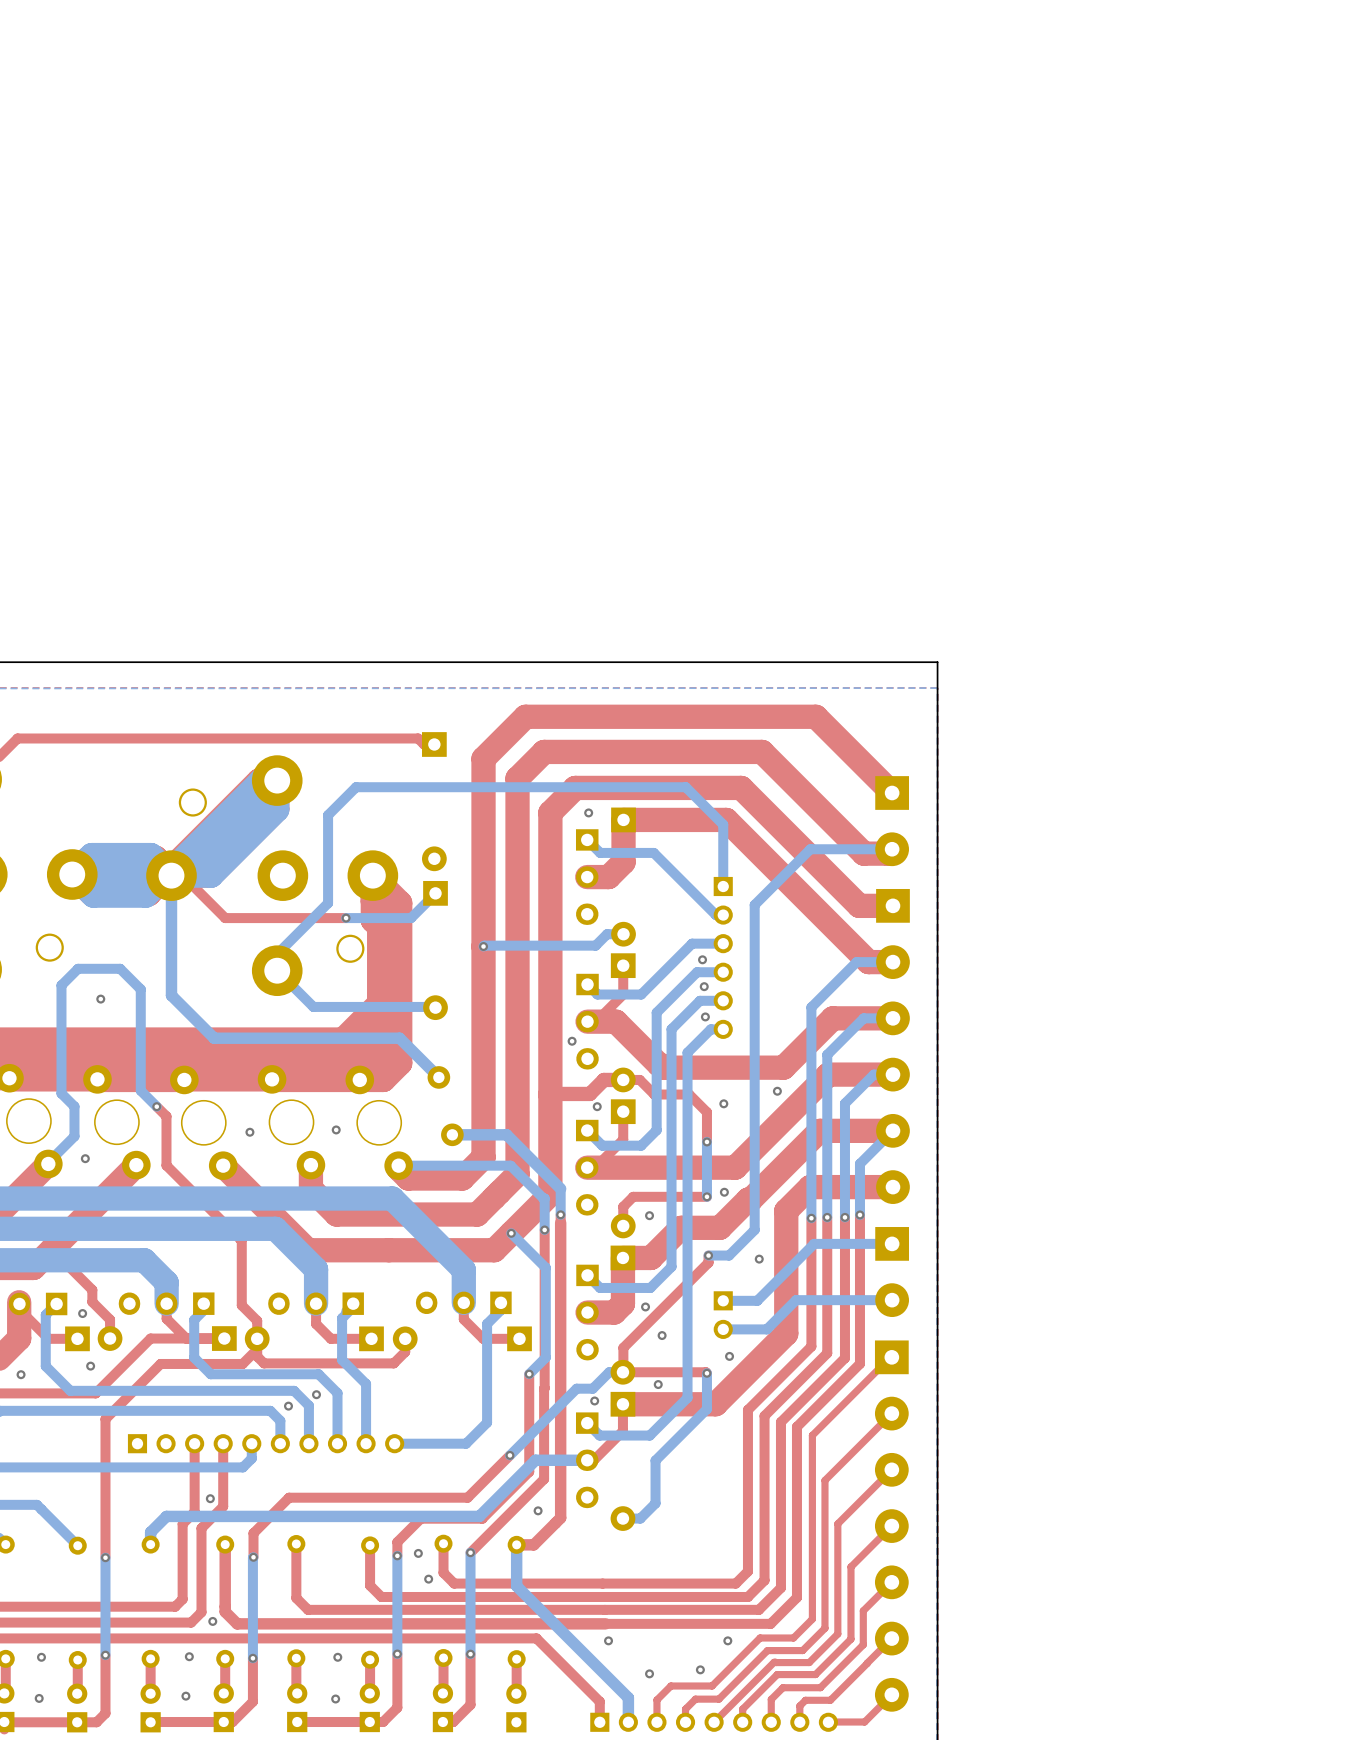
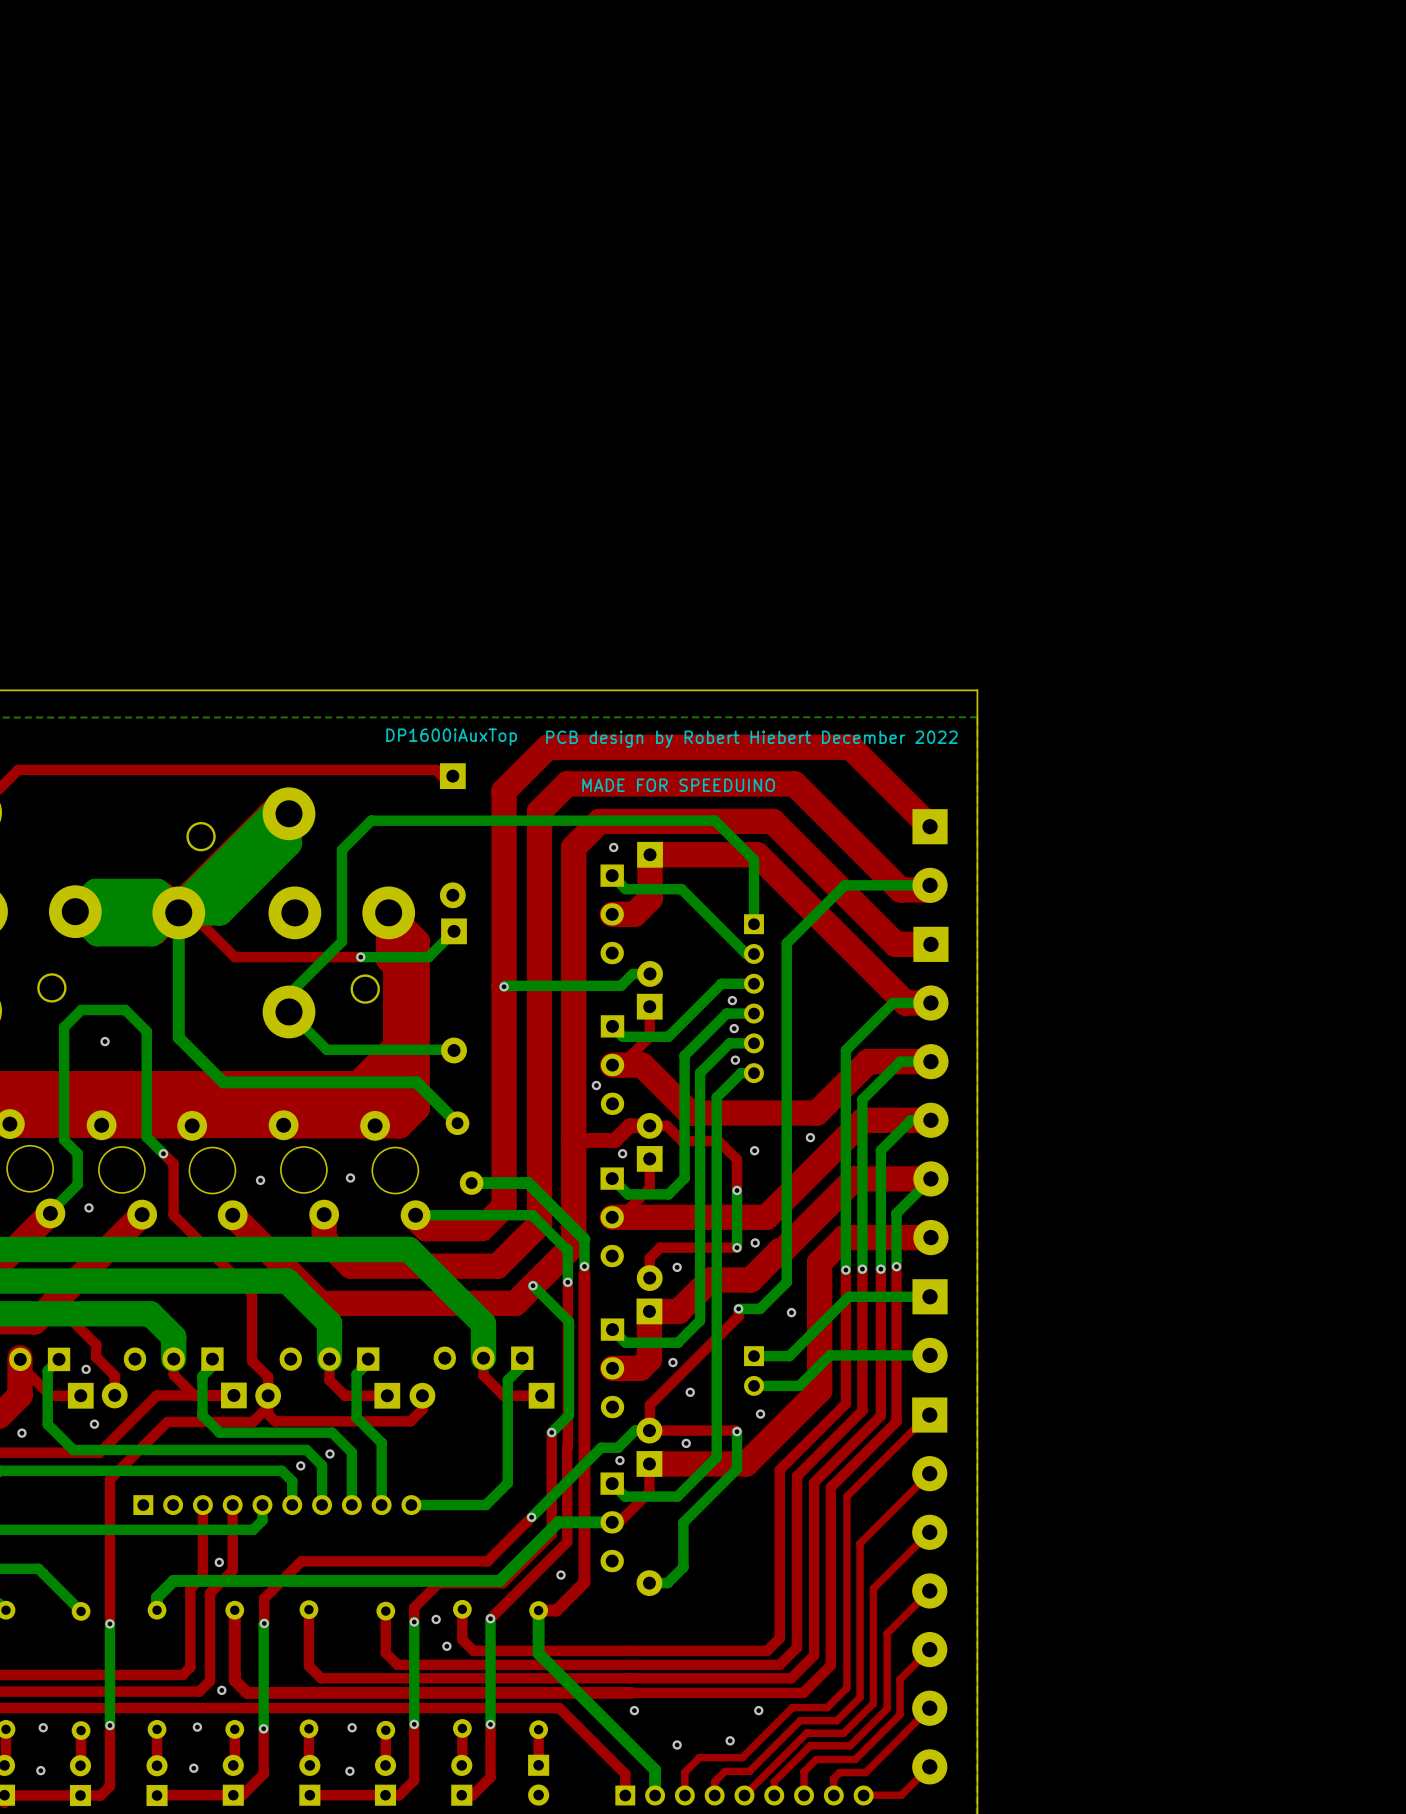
text: none -> DP1600iAuxTop (451, 737)
text: none -> PCB design by Robert Hiebert December 2022 (751, 739)
text: none -> MADE FOR SPEEDUINO (678, 785)
part rotation: 0° (516, 1708) -> 180° (538, 1780)

